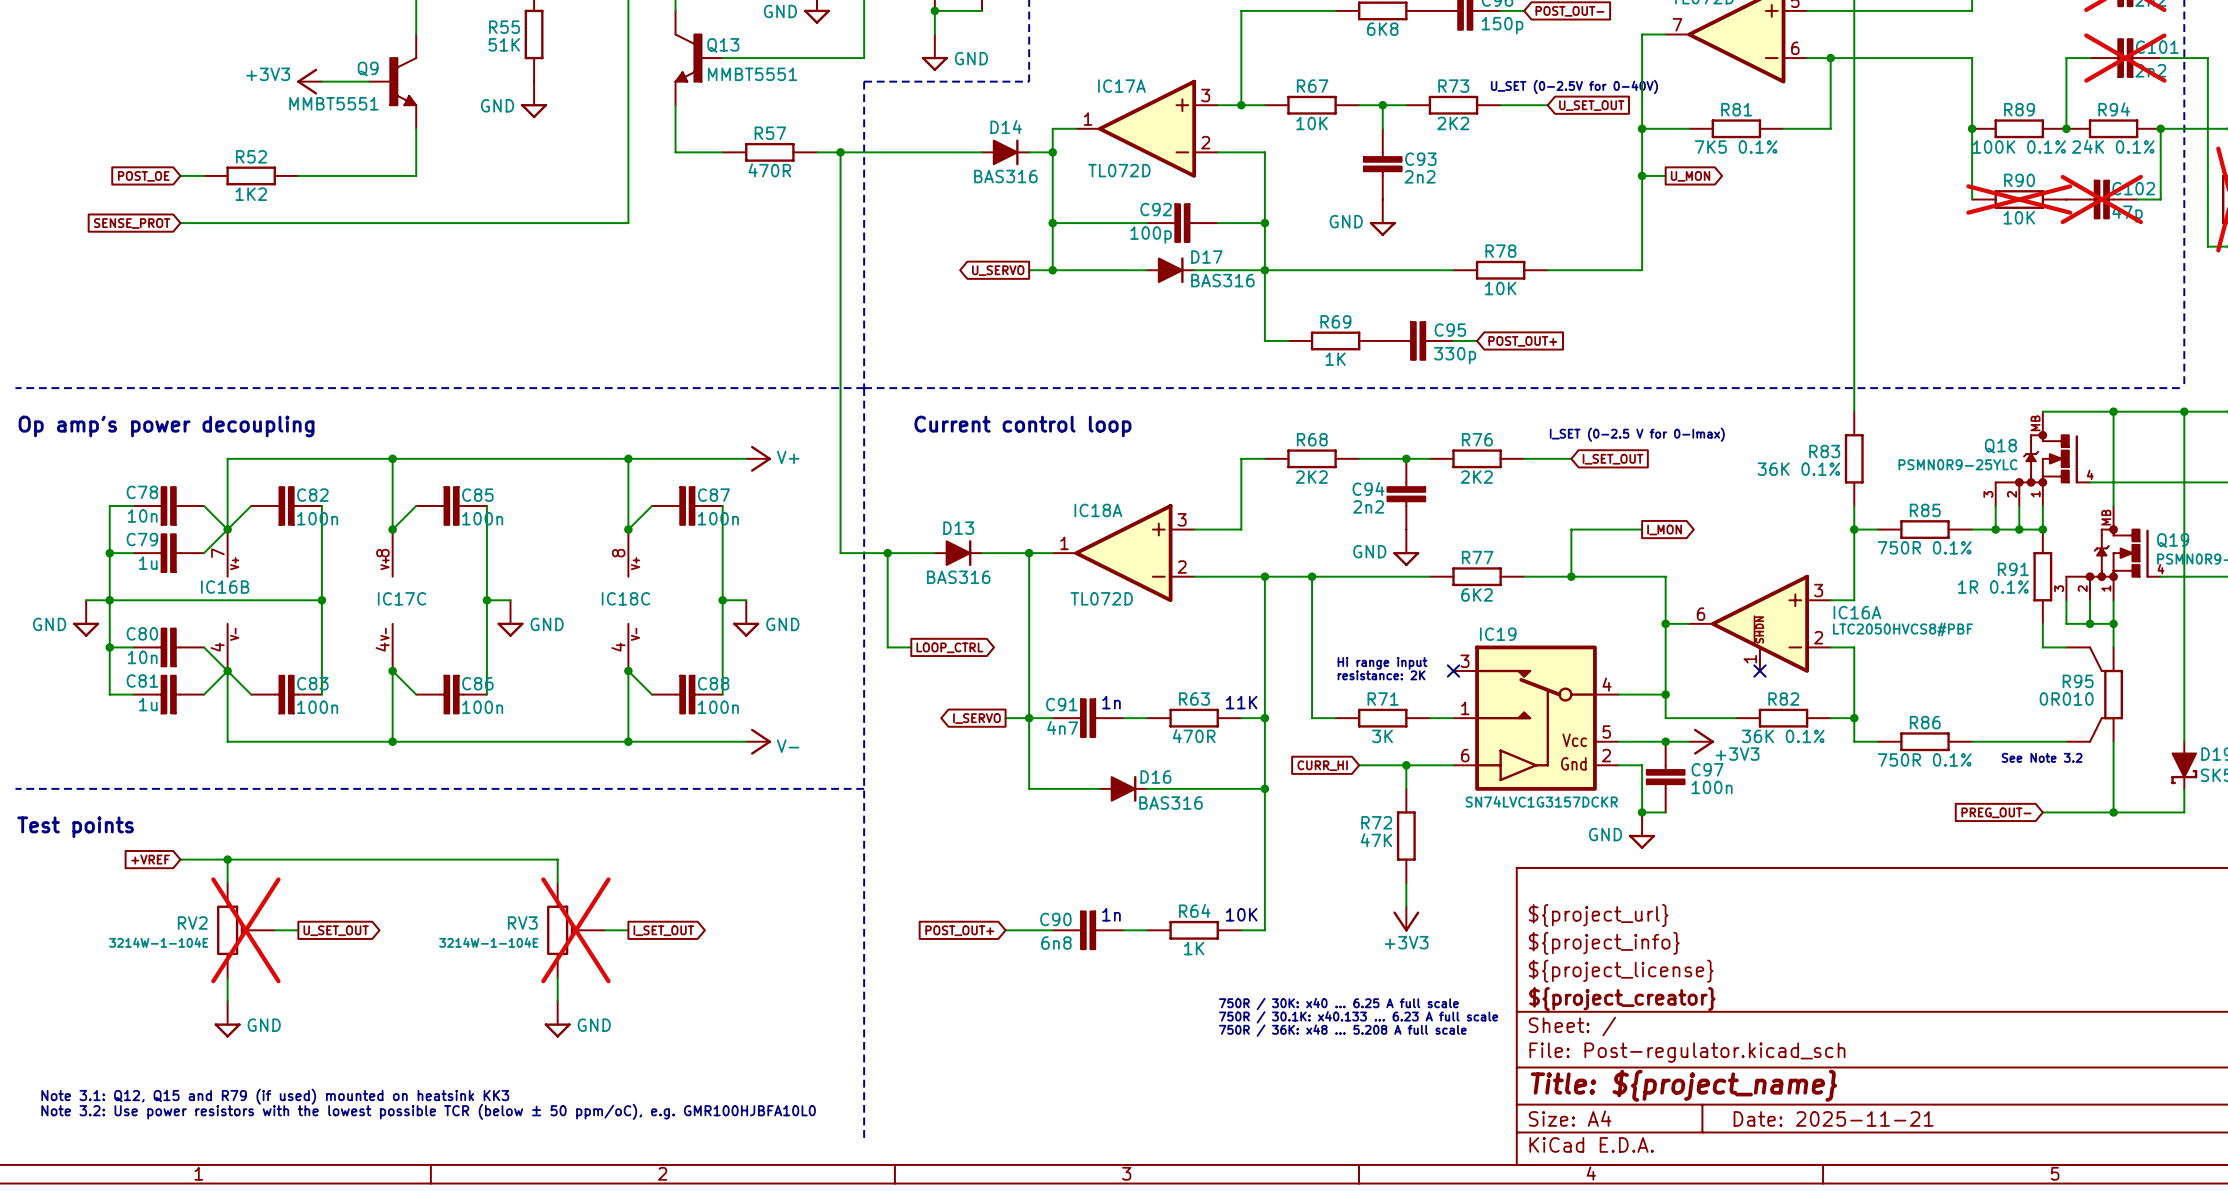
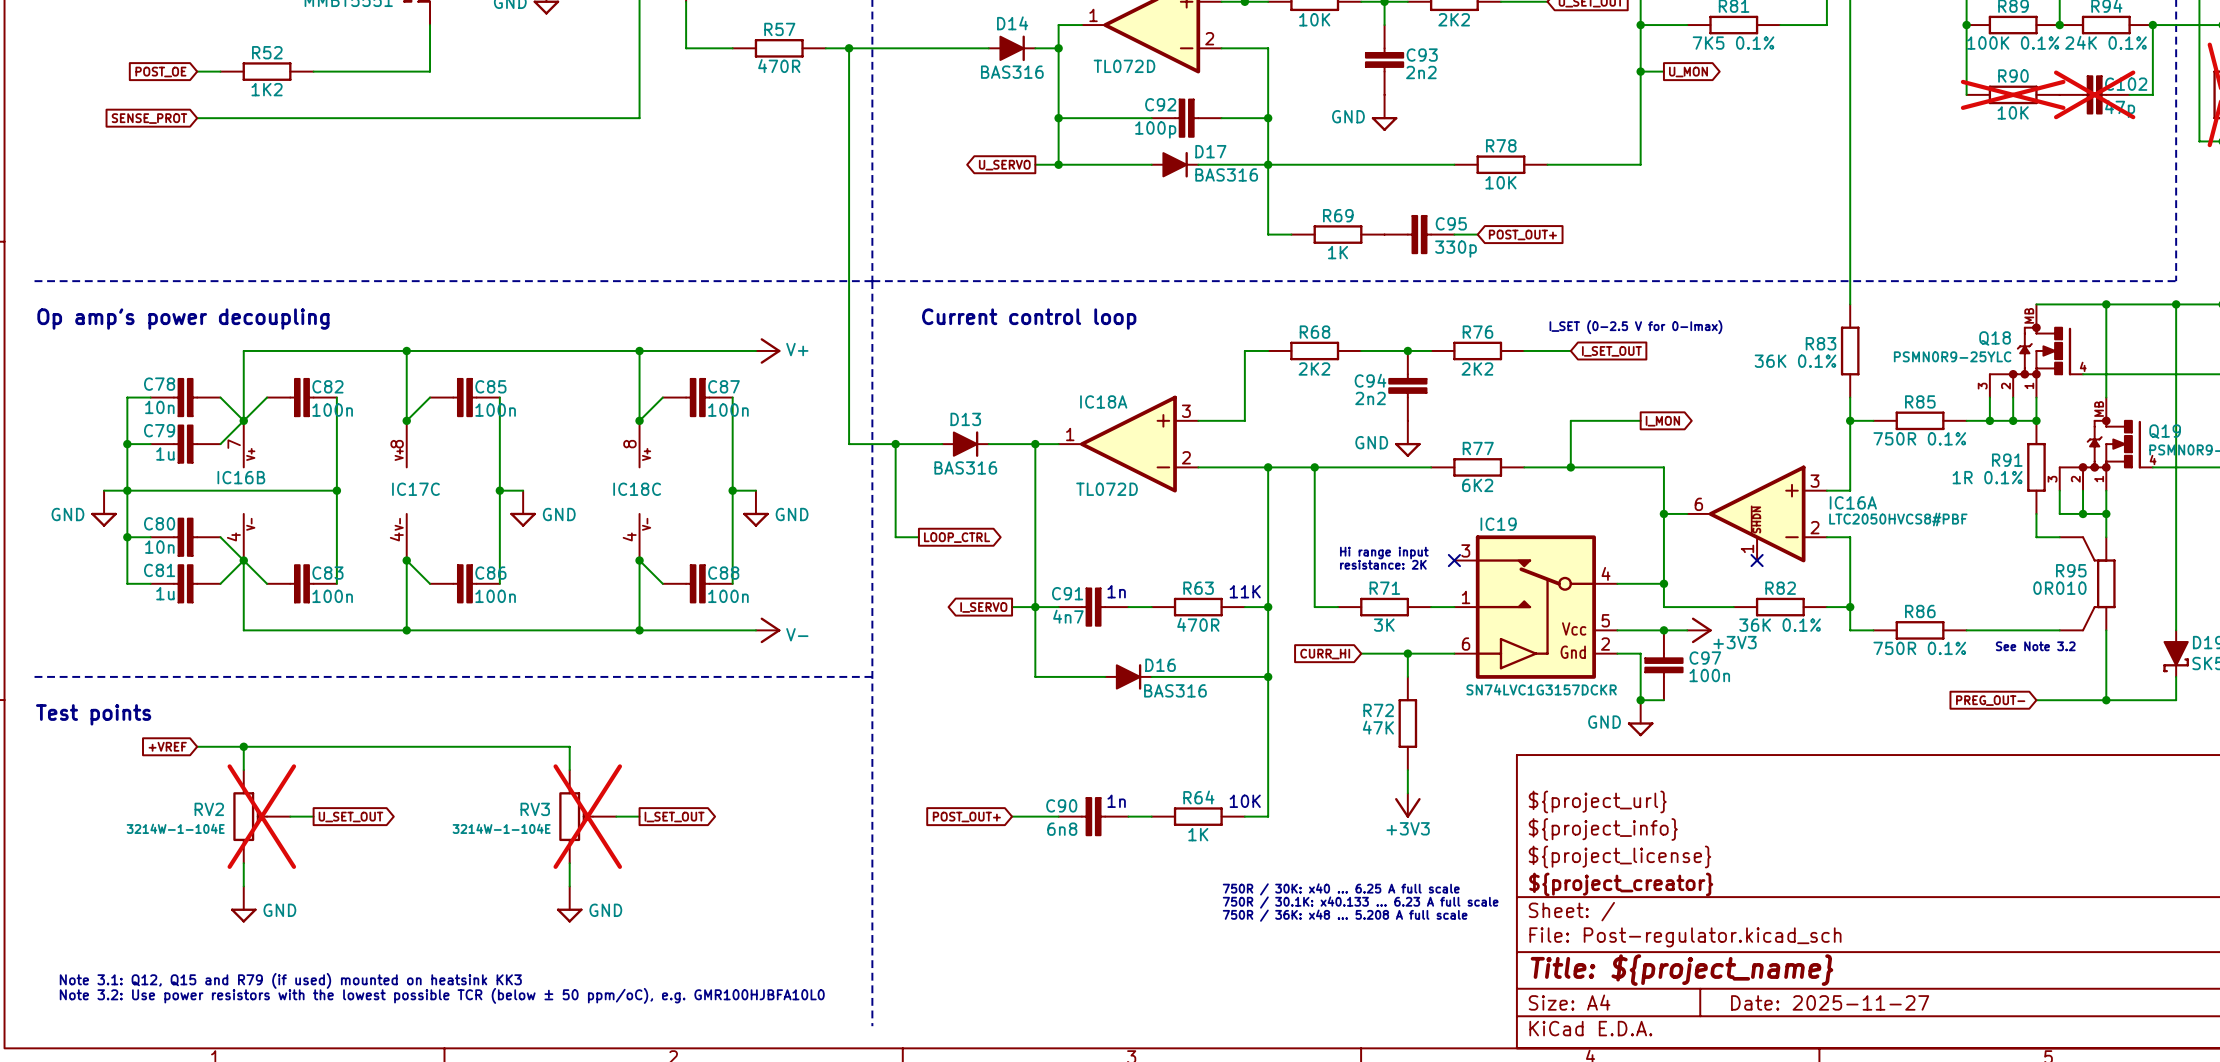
title block: Date: 2025-11-21 (1833, 1118) -> Date: 2025-11-27 (1830, 1002)

